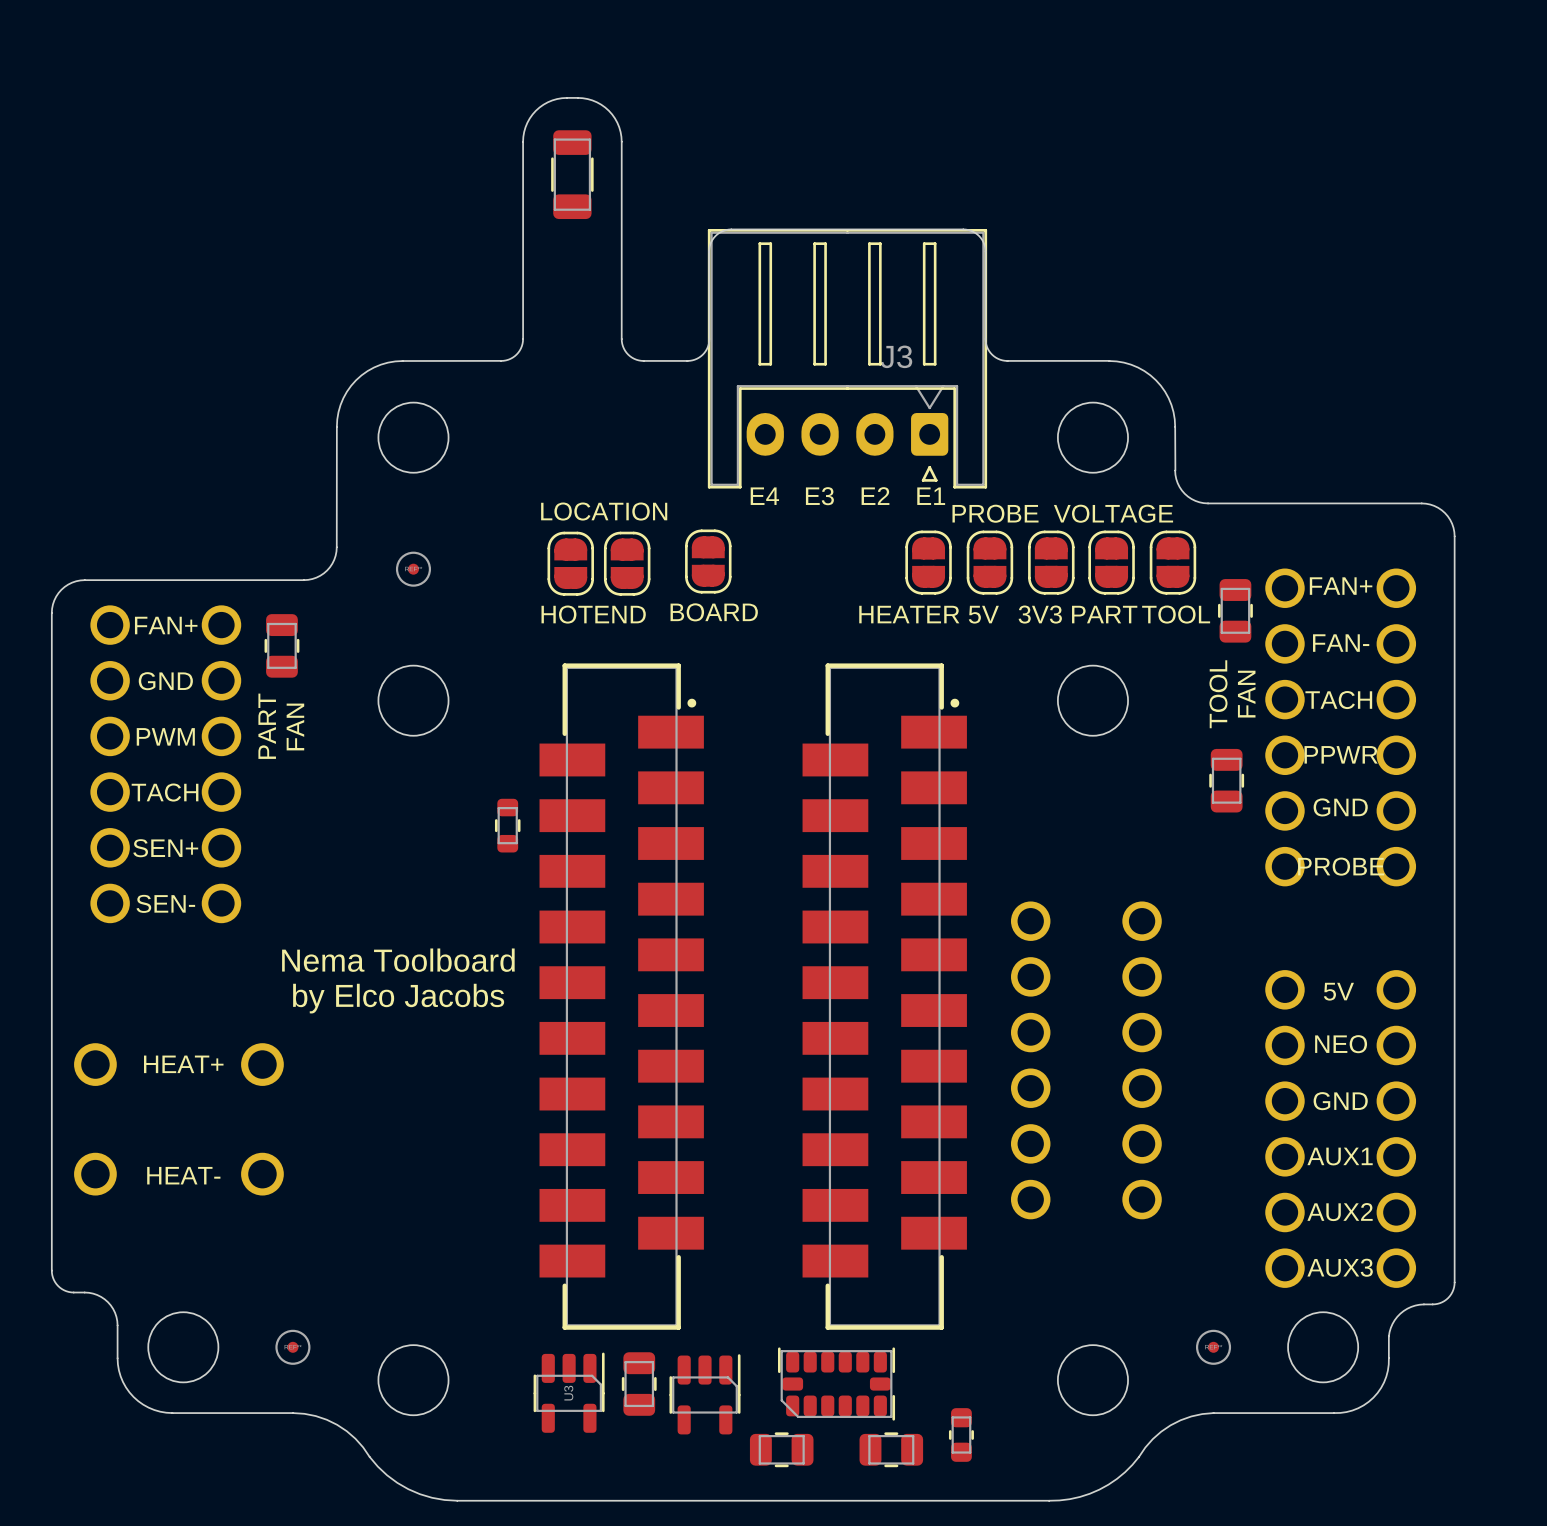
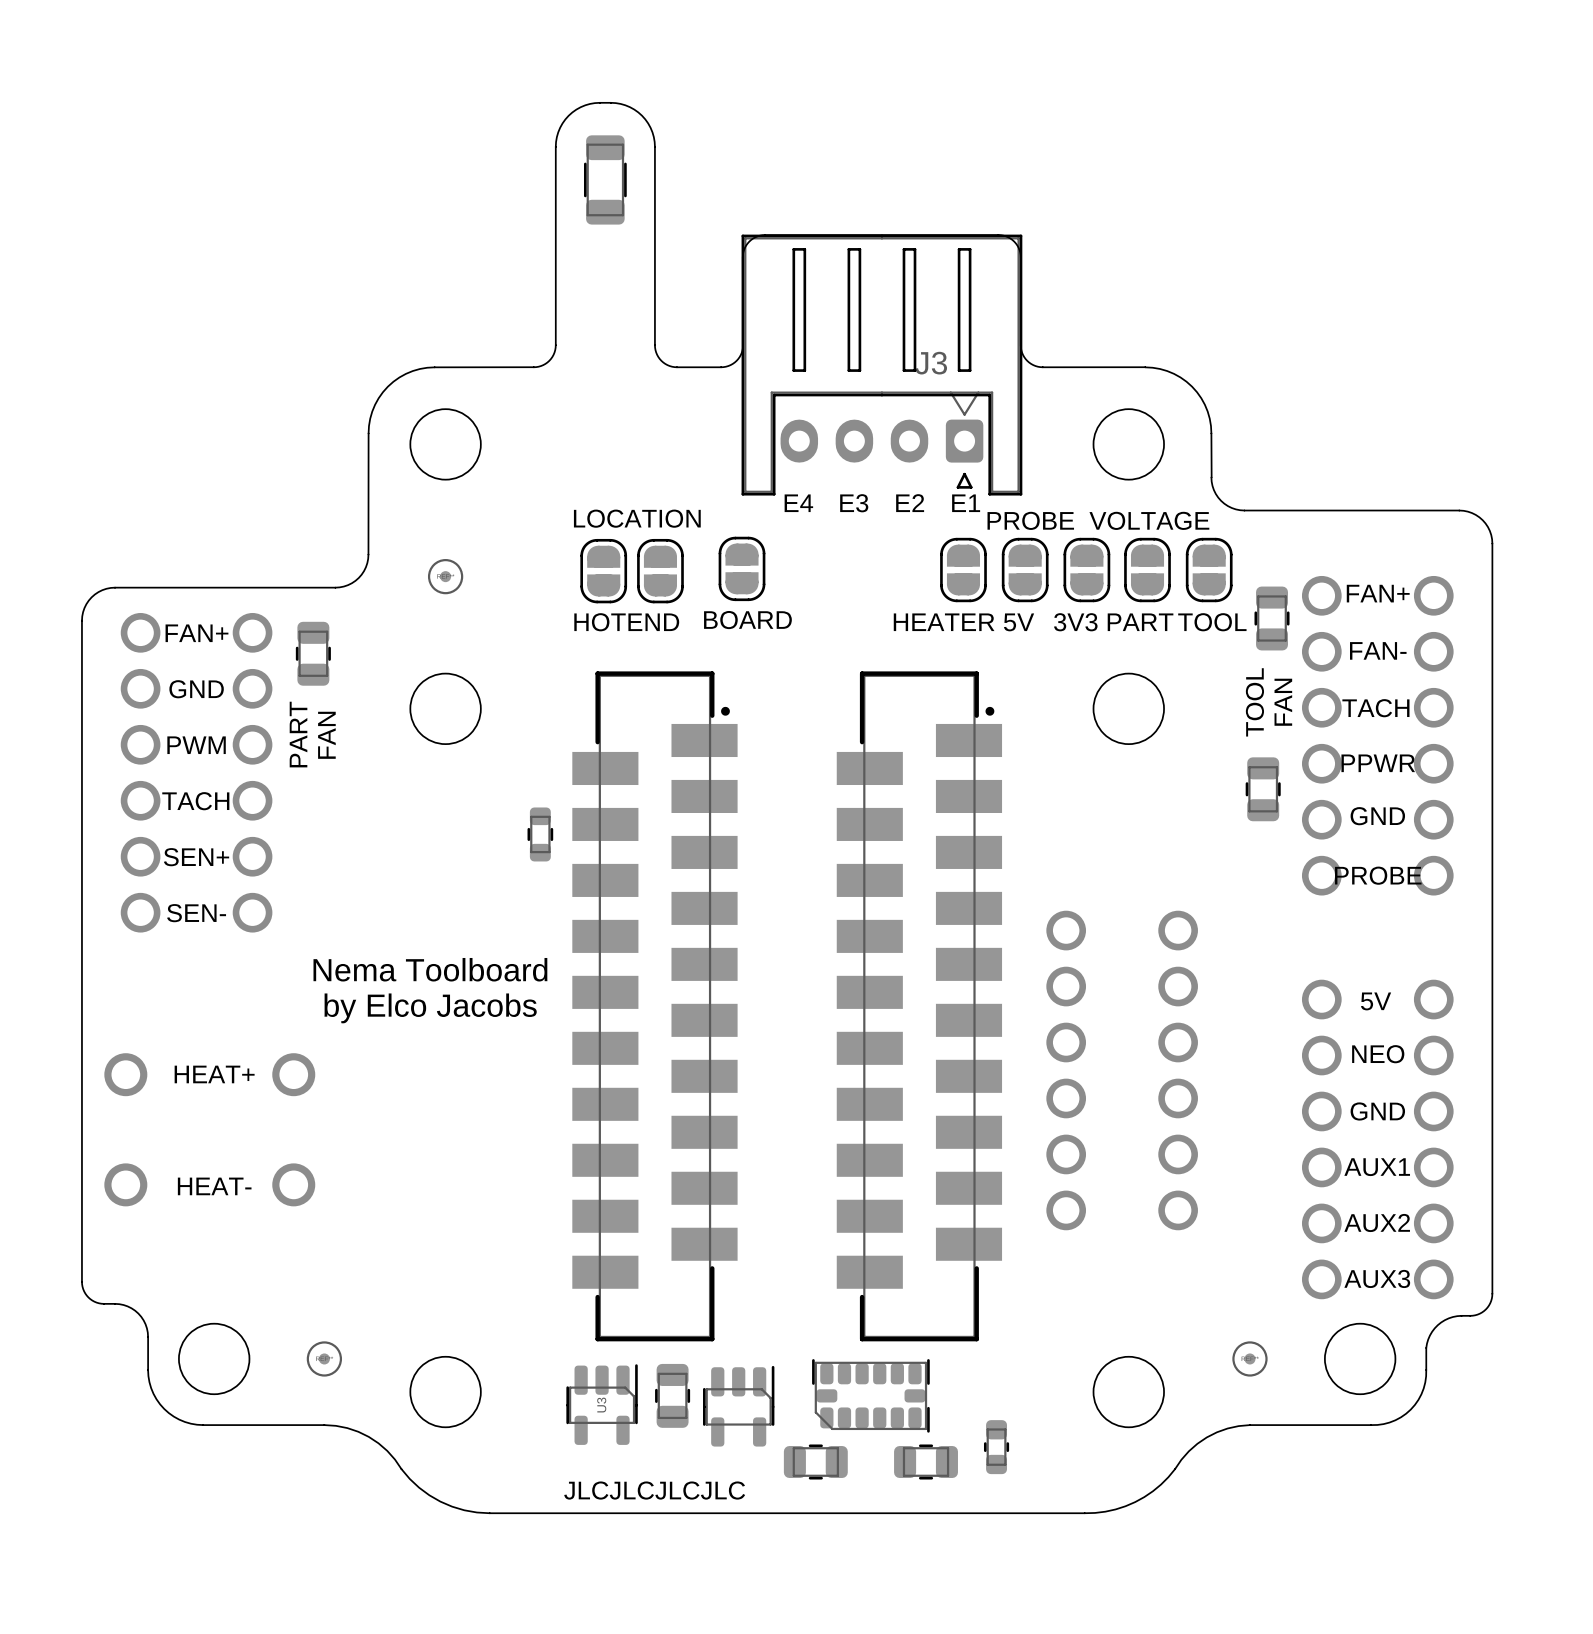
text: none -> JLCJLCJLCJLC (654, 1490)

